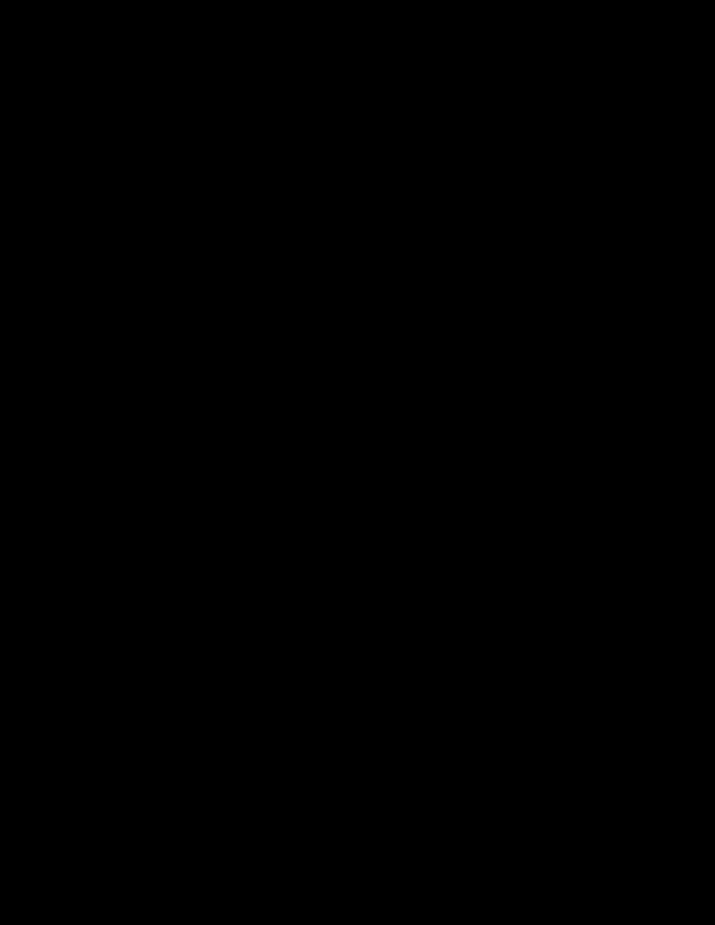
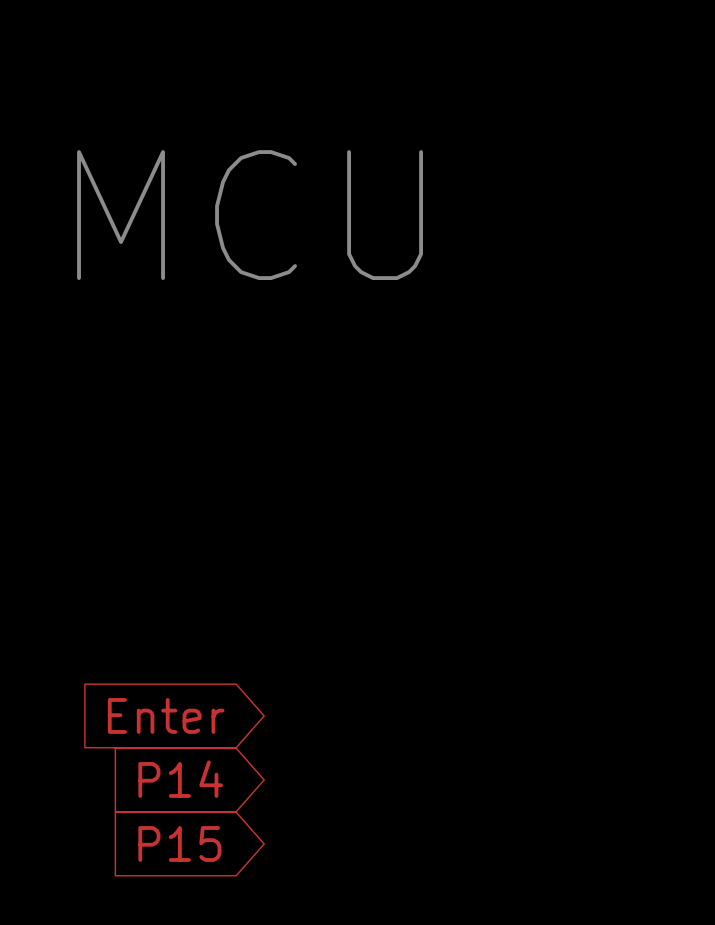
text: none -> MCU (250, 215)
global label: none -> Enter (166, 715)
global label: none -> P14 (180, 779)
global label: none -> P15 (179, 843)

